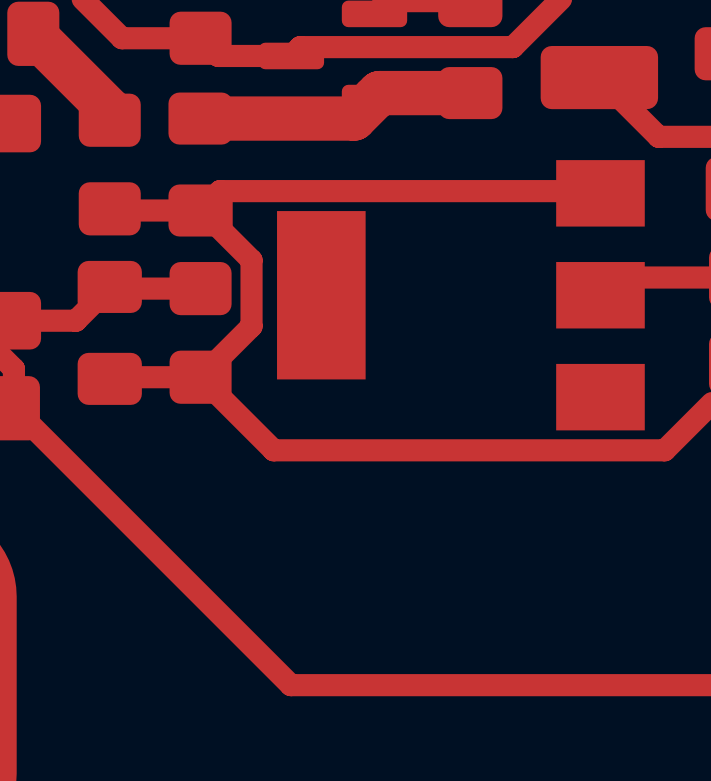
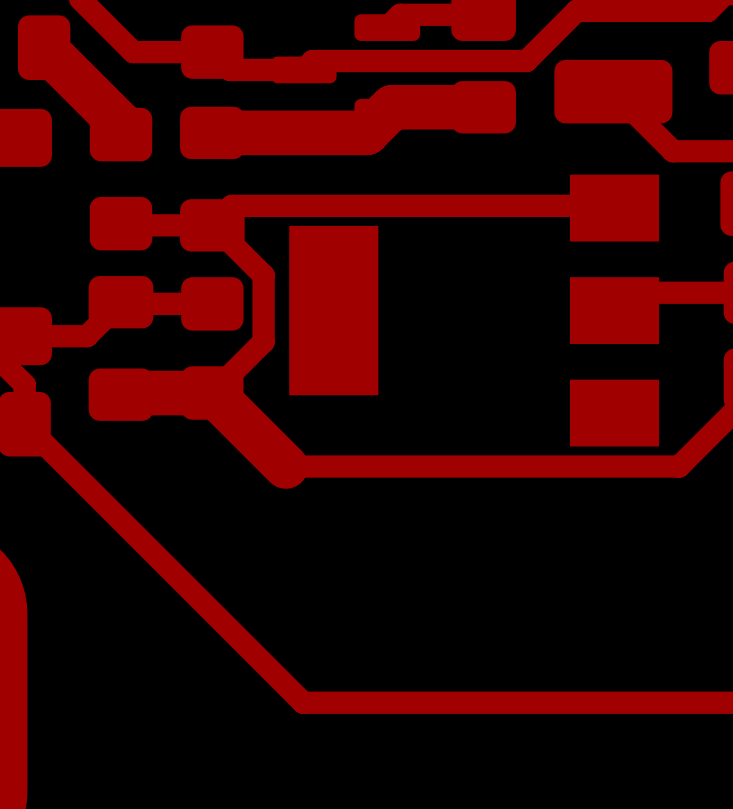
top track width: thin (109, 378) (111, 377) (200, 377) (273, 450) -> thick (121, 394) (122, 393) (212, 393) (285, 466)

